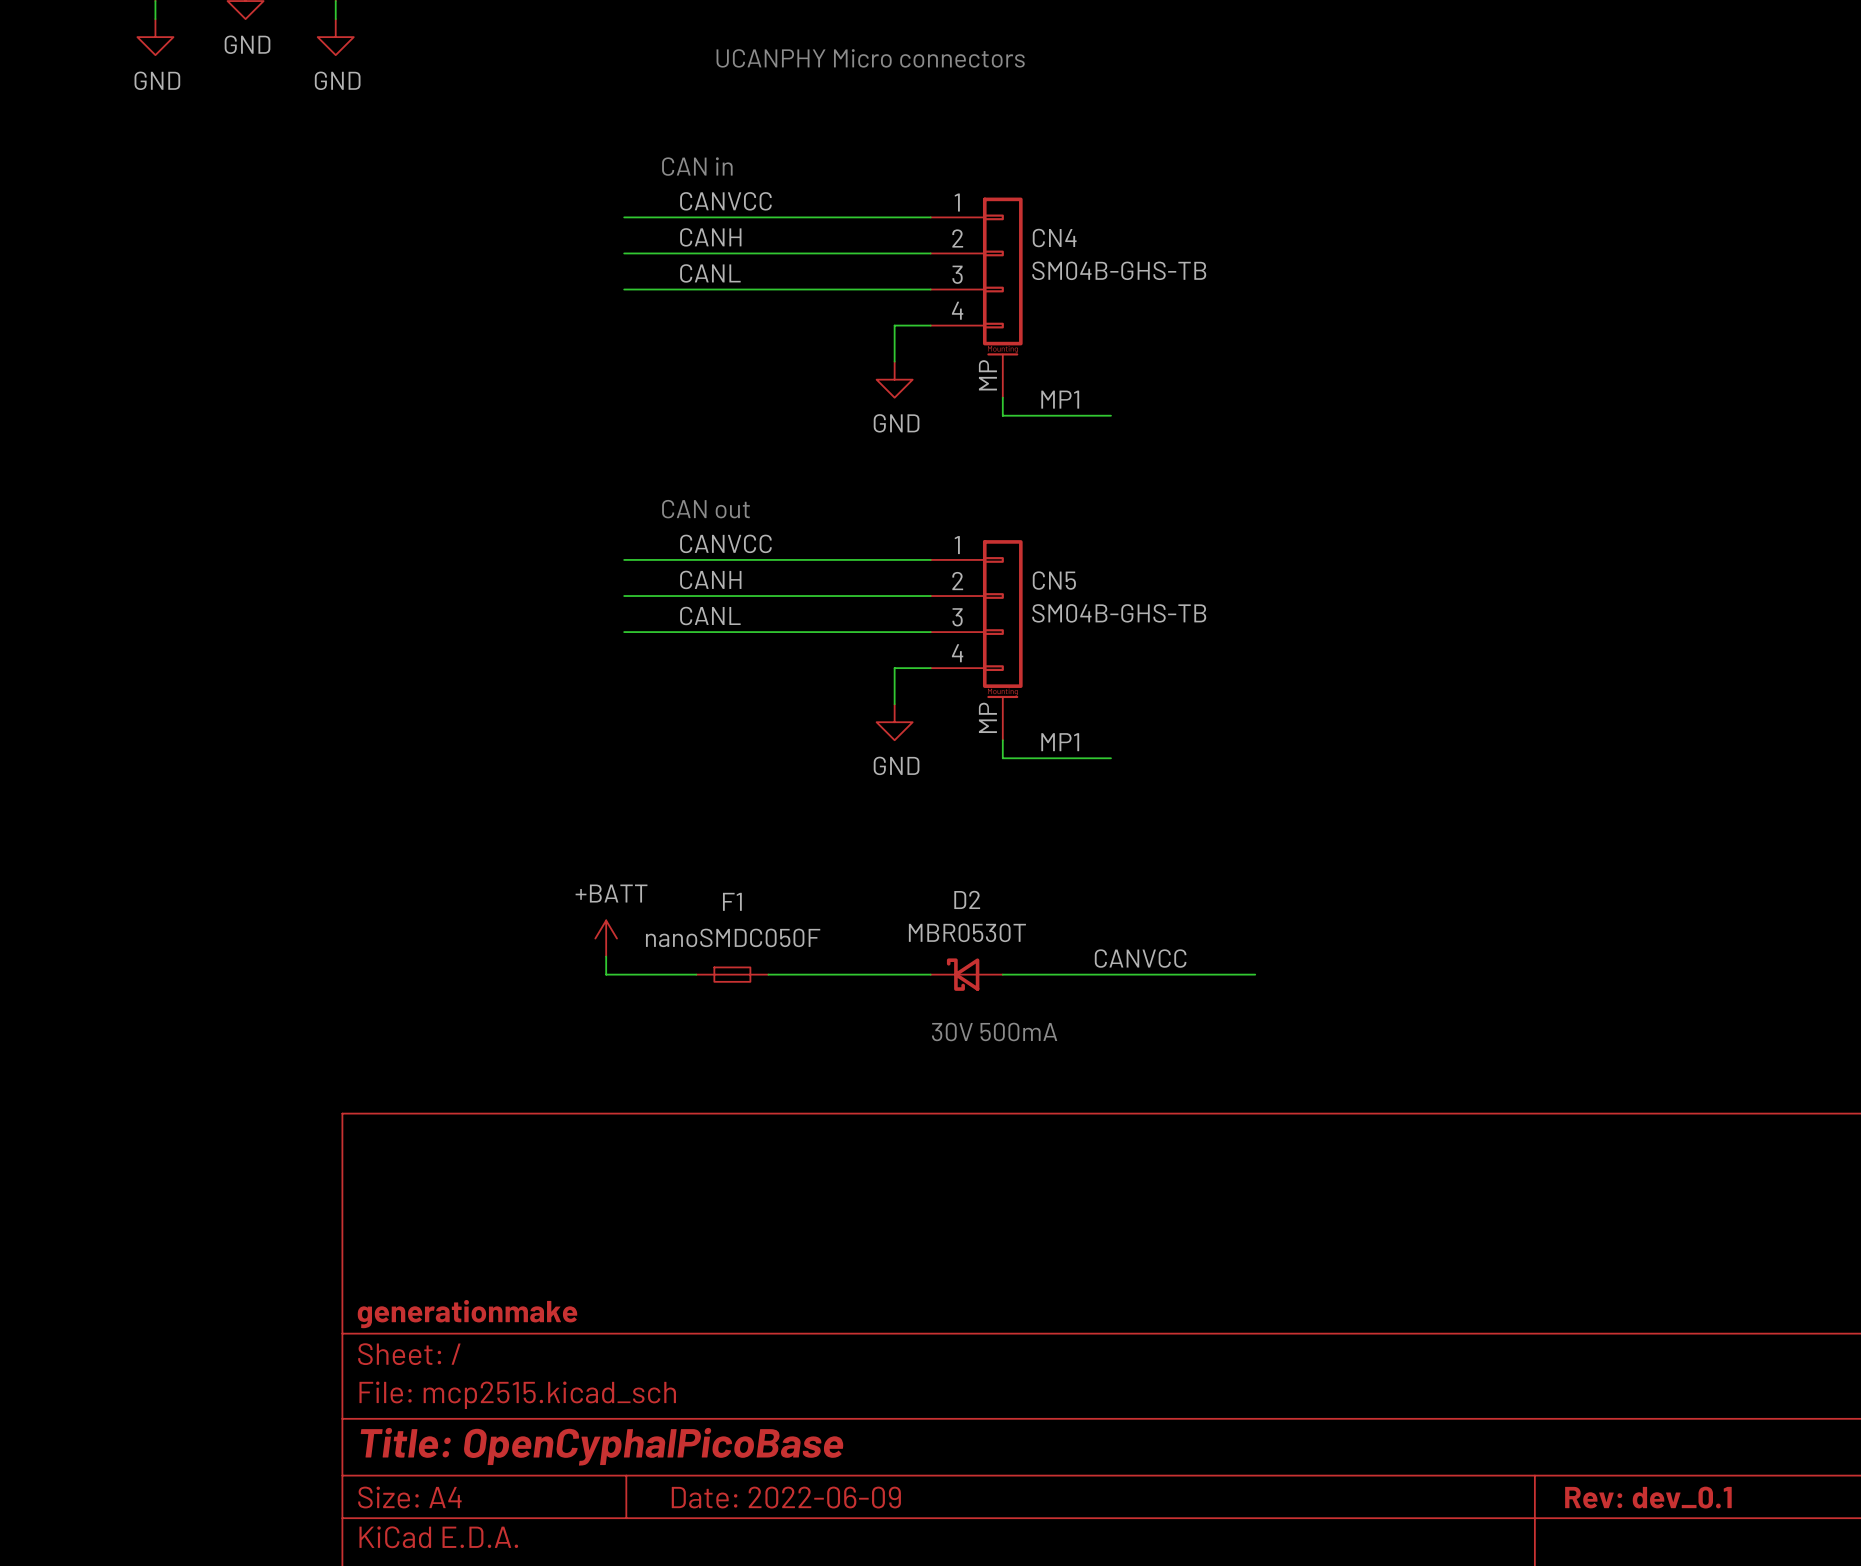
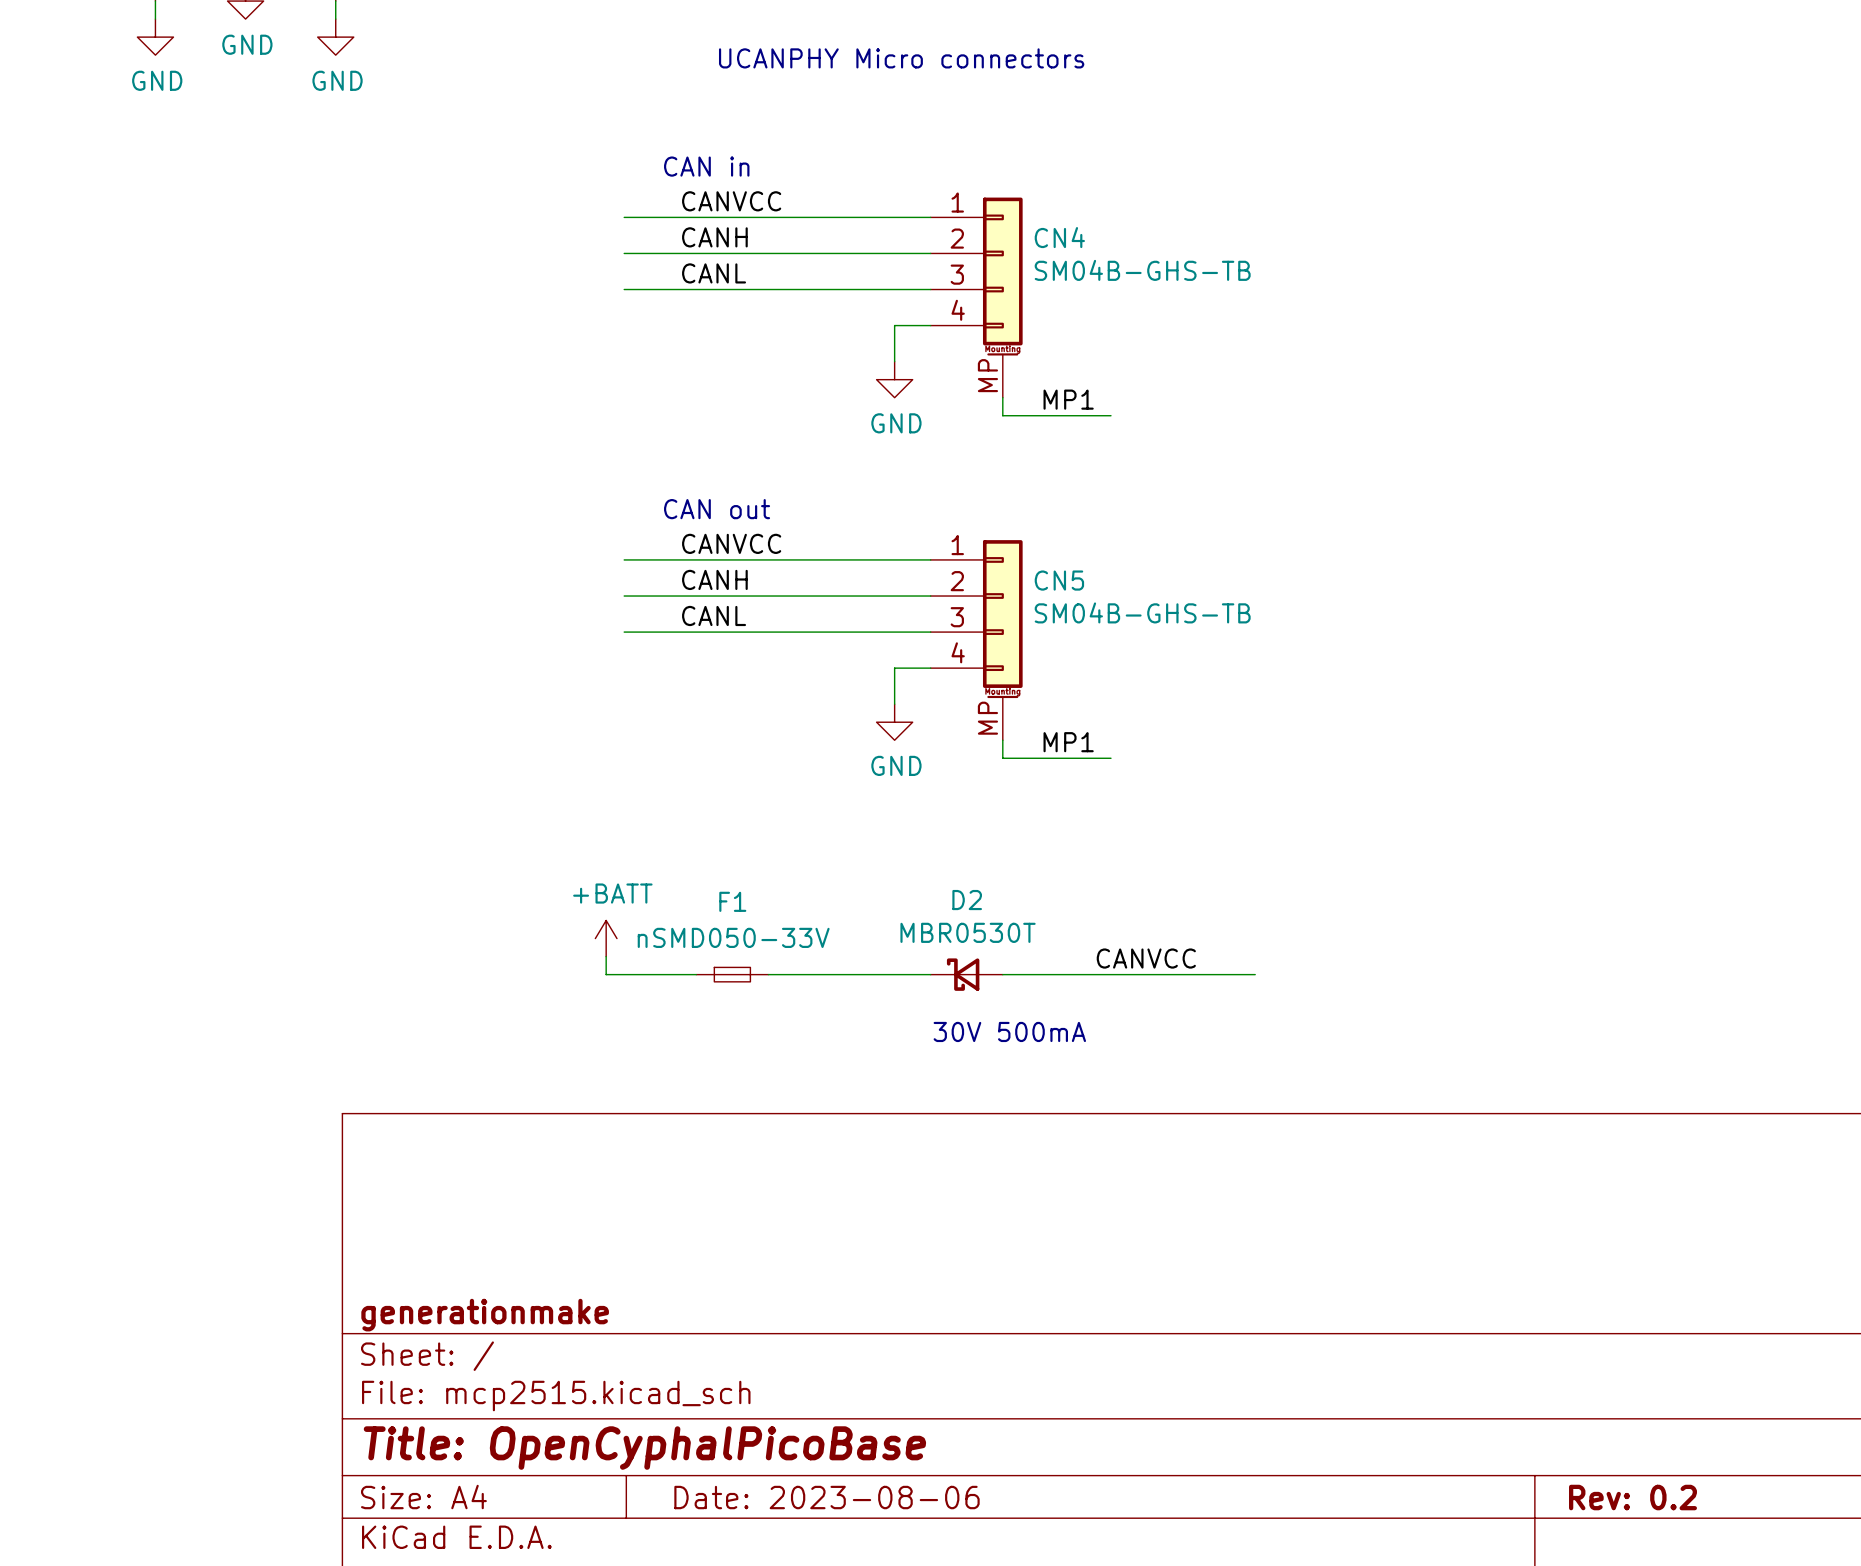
F1 value: nanoSMDC050F (733, 937) -> nSMD050-33V (733, 937)
title block: Date: 2022-06-09 (786, 1497) -> Date: 2023-08-06 (827, 1497)
title block: Rev: dev_0.1 (1648, 1497) -> Rev: 0.2 (1632, 1497)

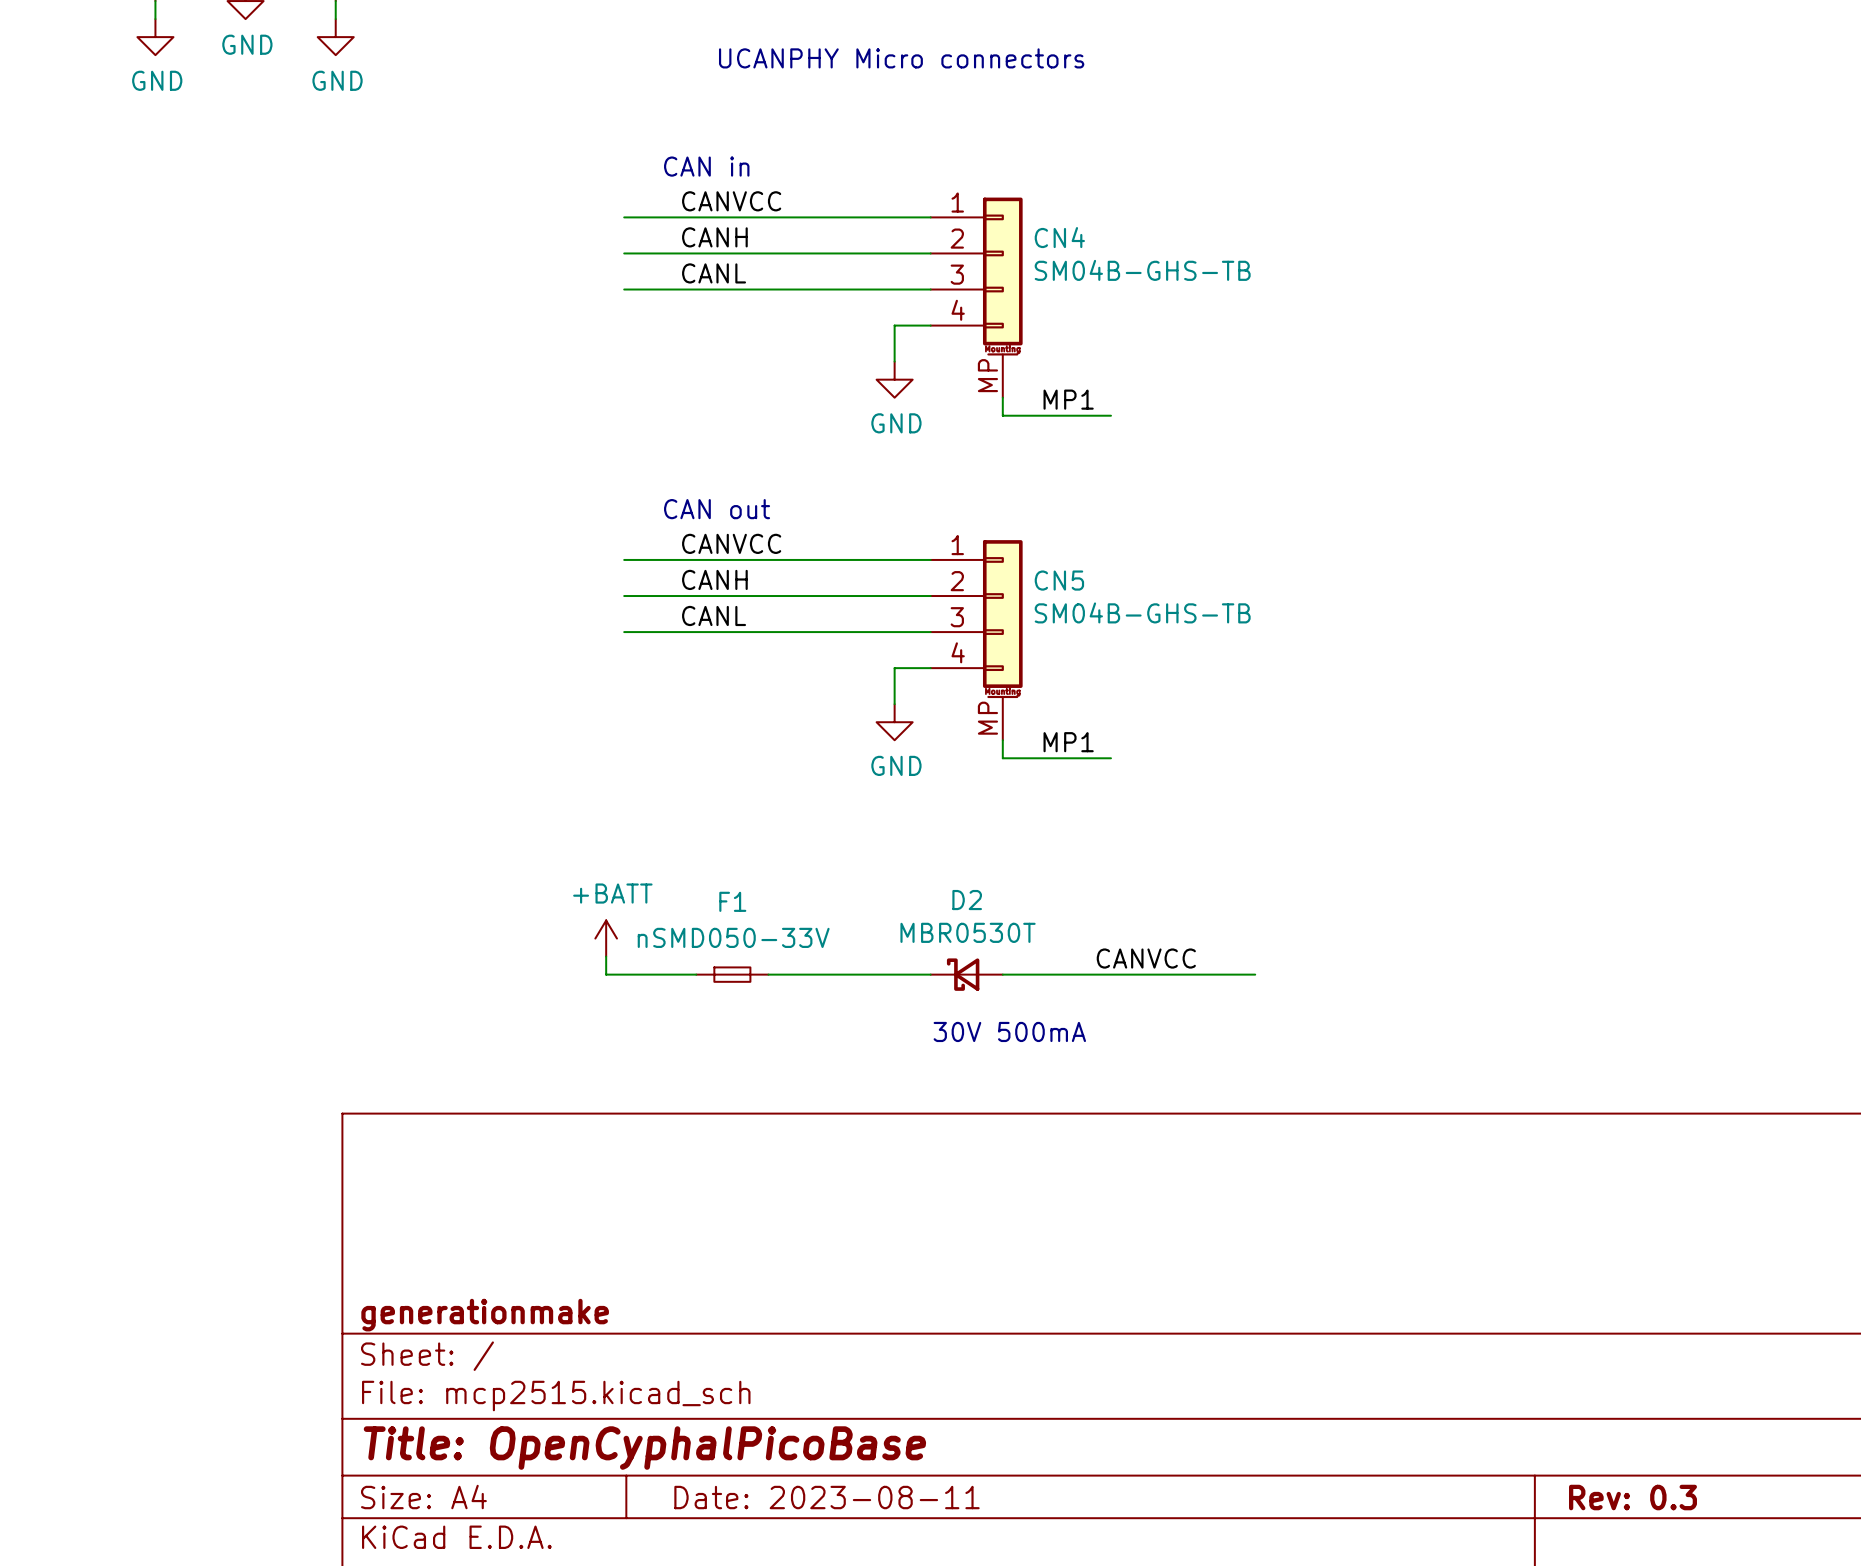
title block: Date: 2023-08-06 (827, 1497) -> Date: 2023-08-11 (827, 1497)
title block: Rev: 0.2 (1632, 1497) -> Rev: 0.3 (1632, 1497)

